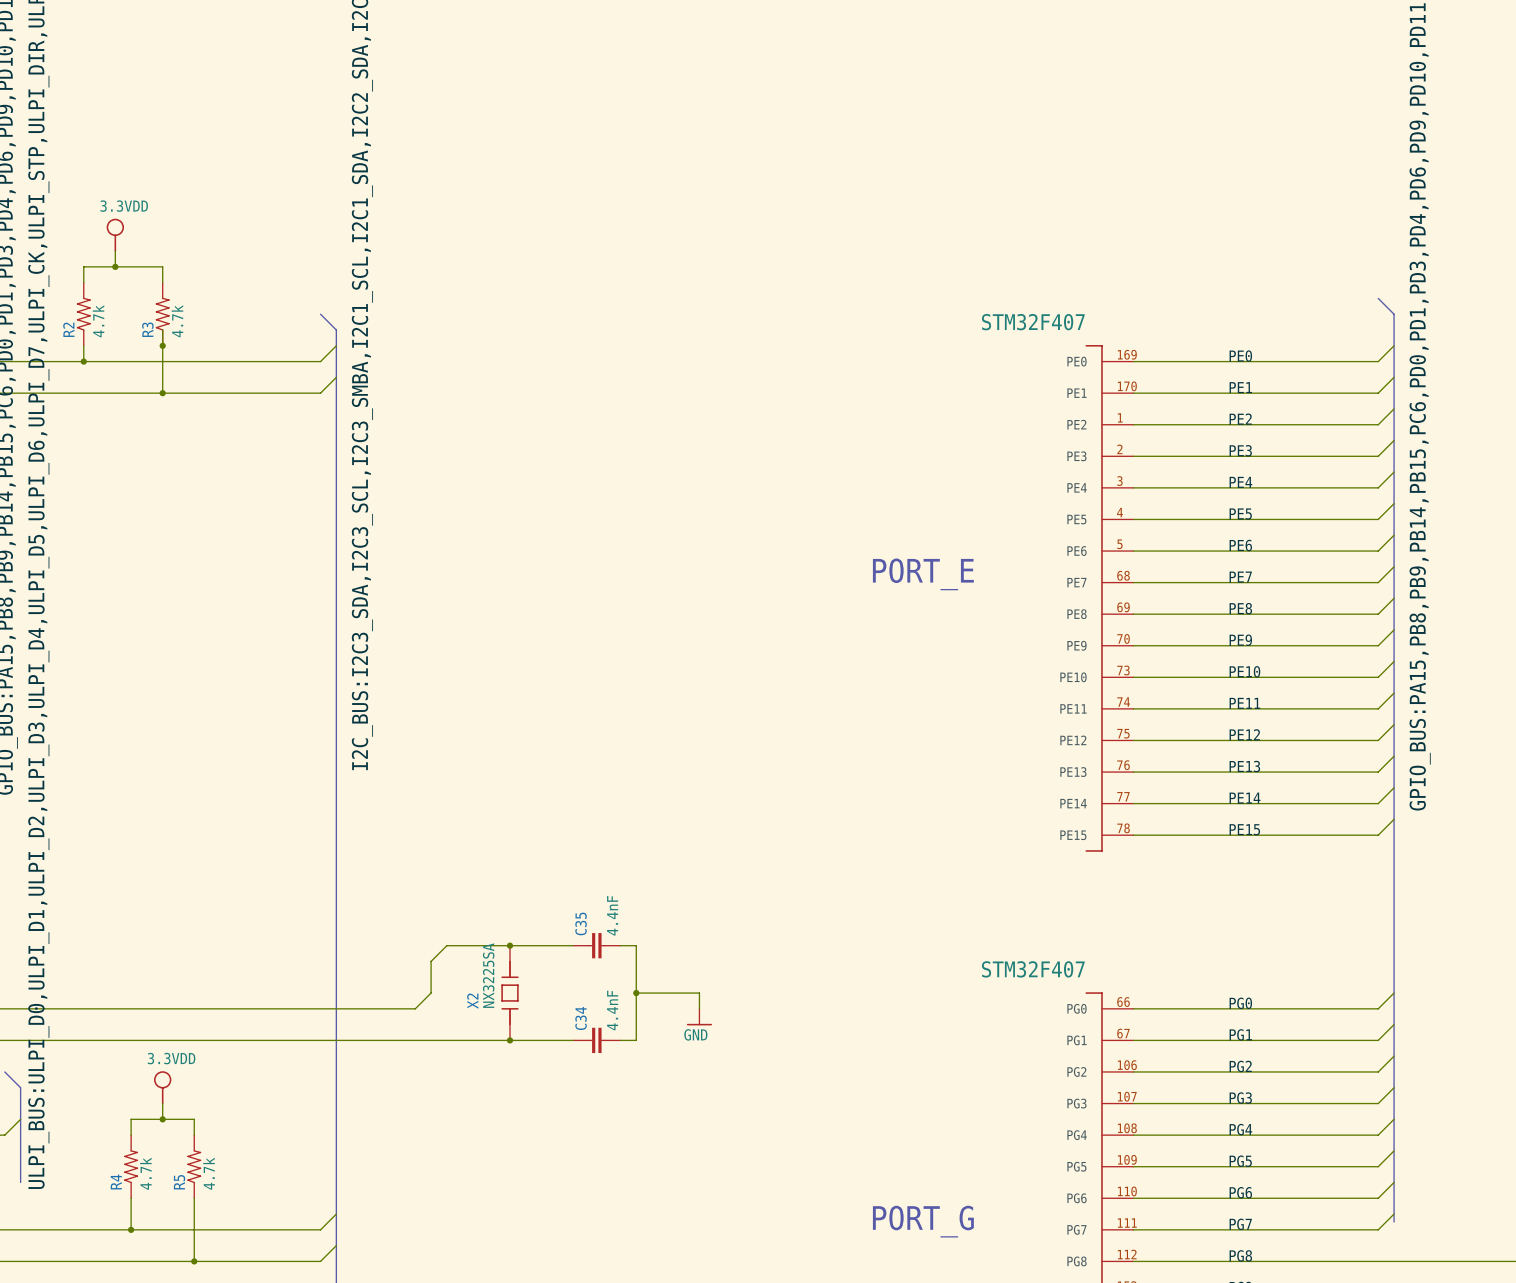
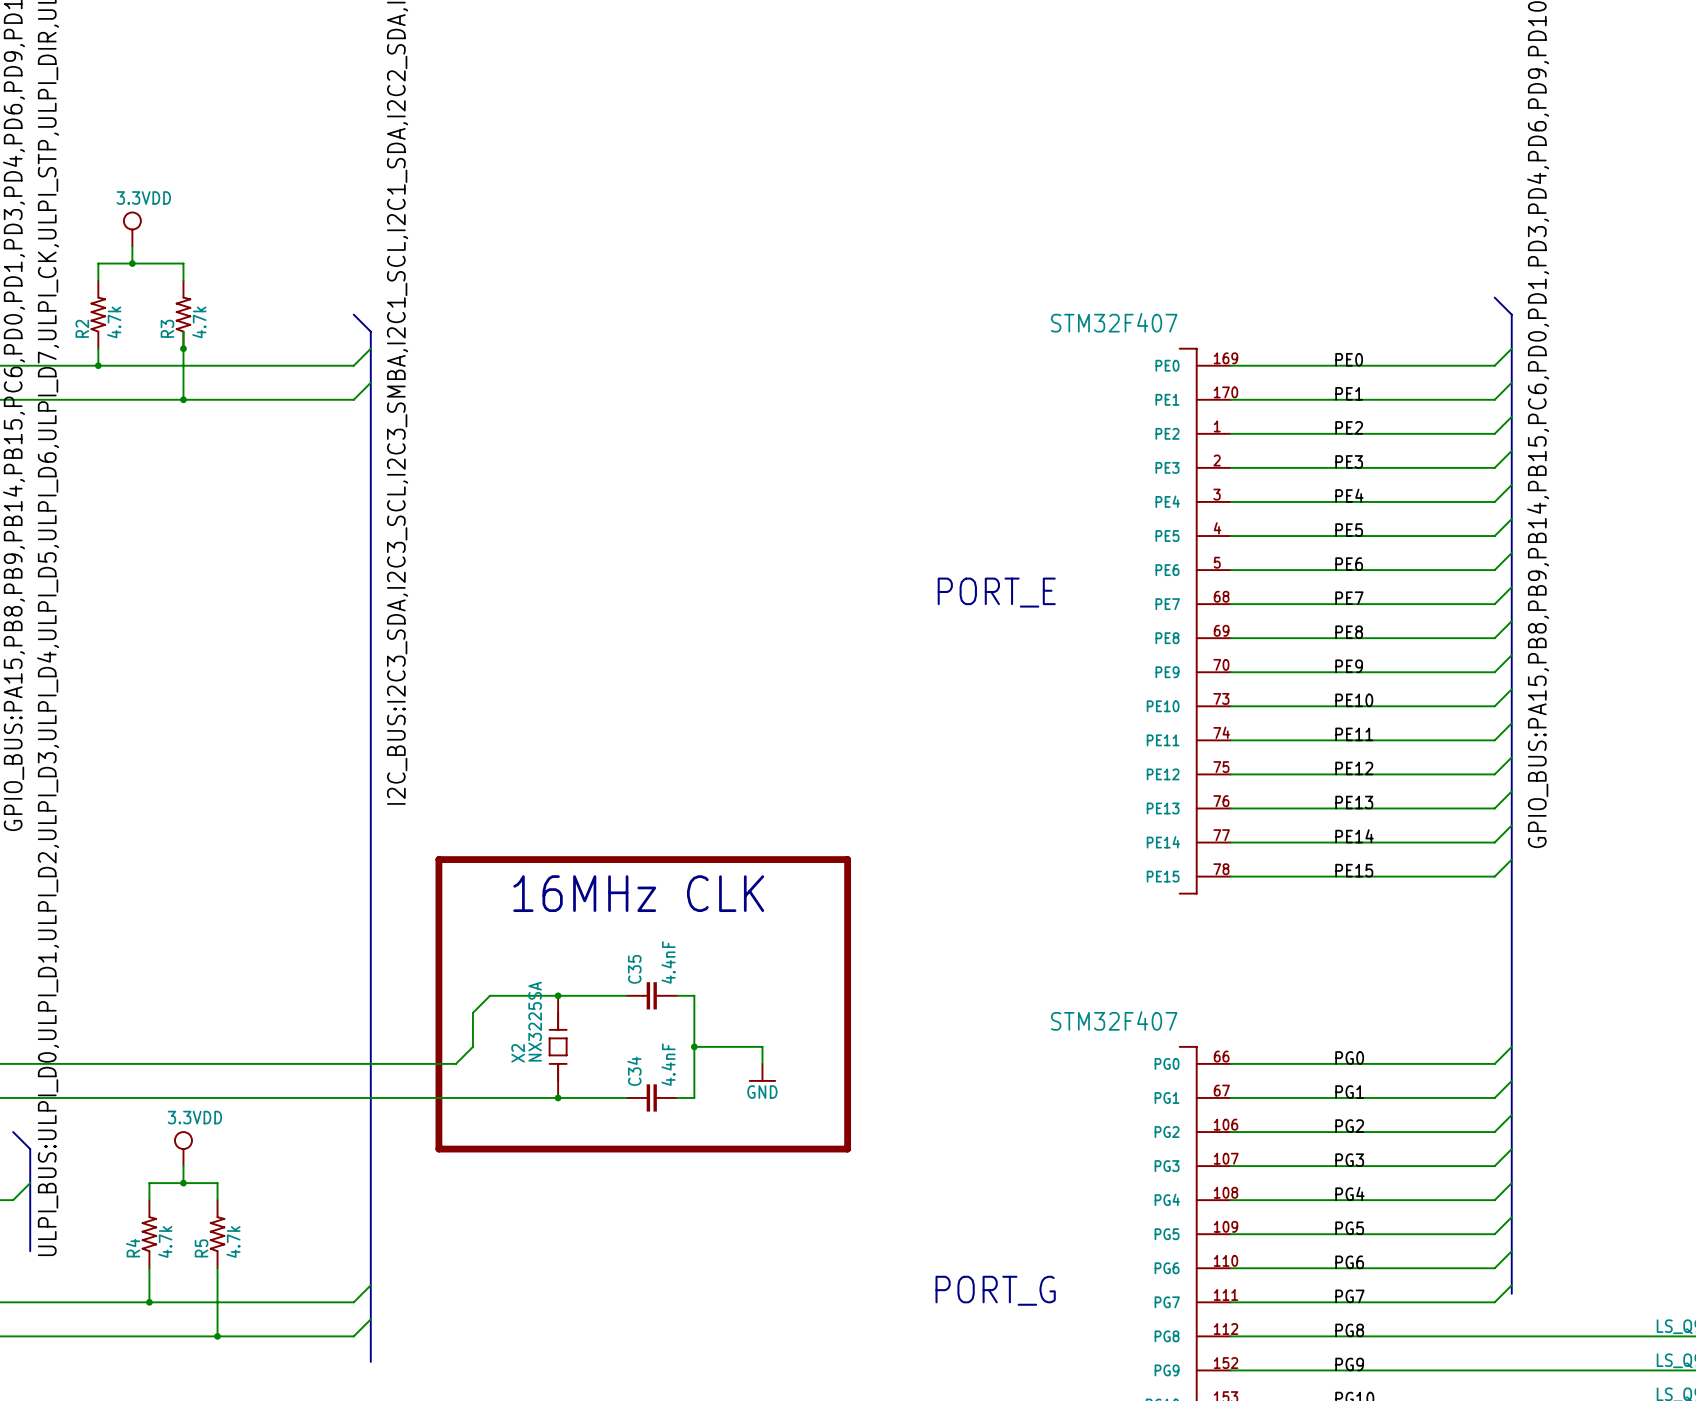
line: none -> (438, 859) (438, 1149) (847, 1149) (847, 859) (438, 859)
text: none -> 16MHz CLK (638, 893)

